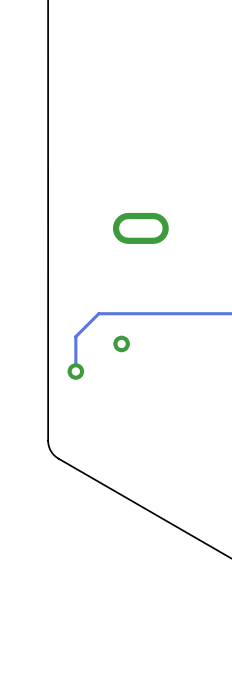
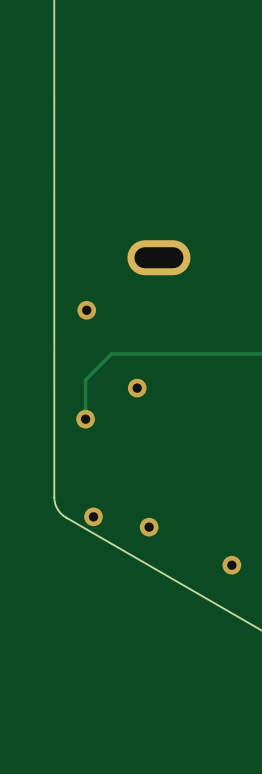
via: none -> (86, 310)
via: none -> (93, 516)
via: none -> (149, 527)
via: none -> (231, 565)

